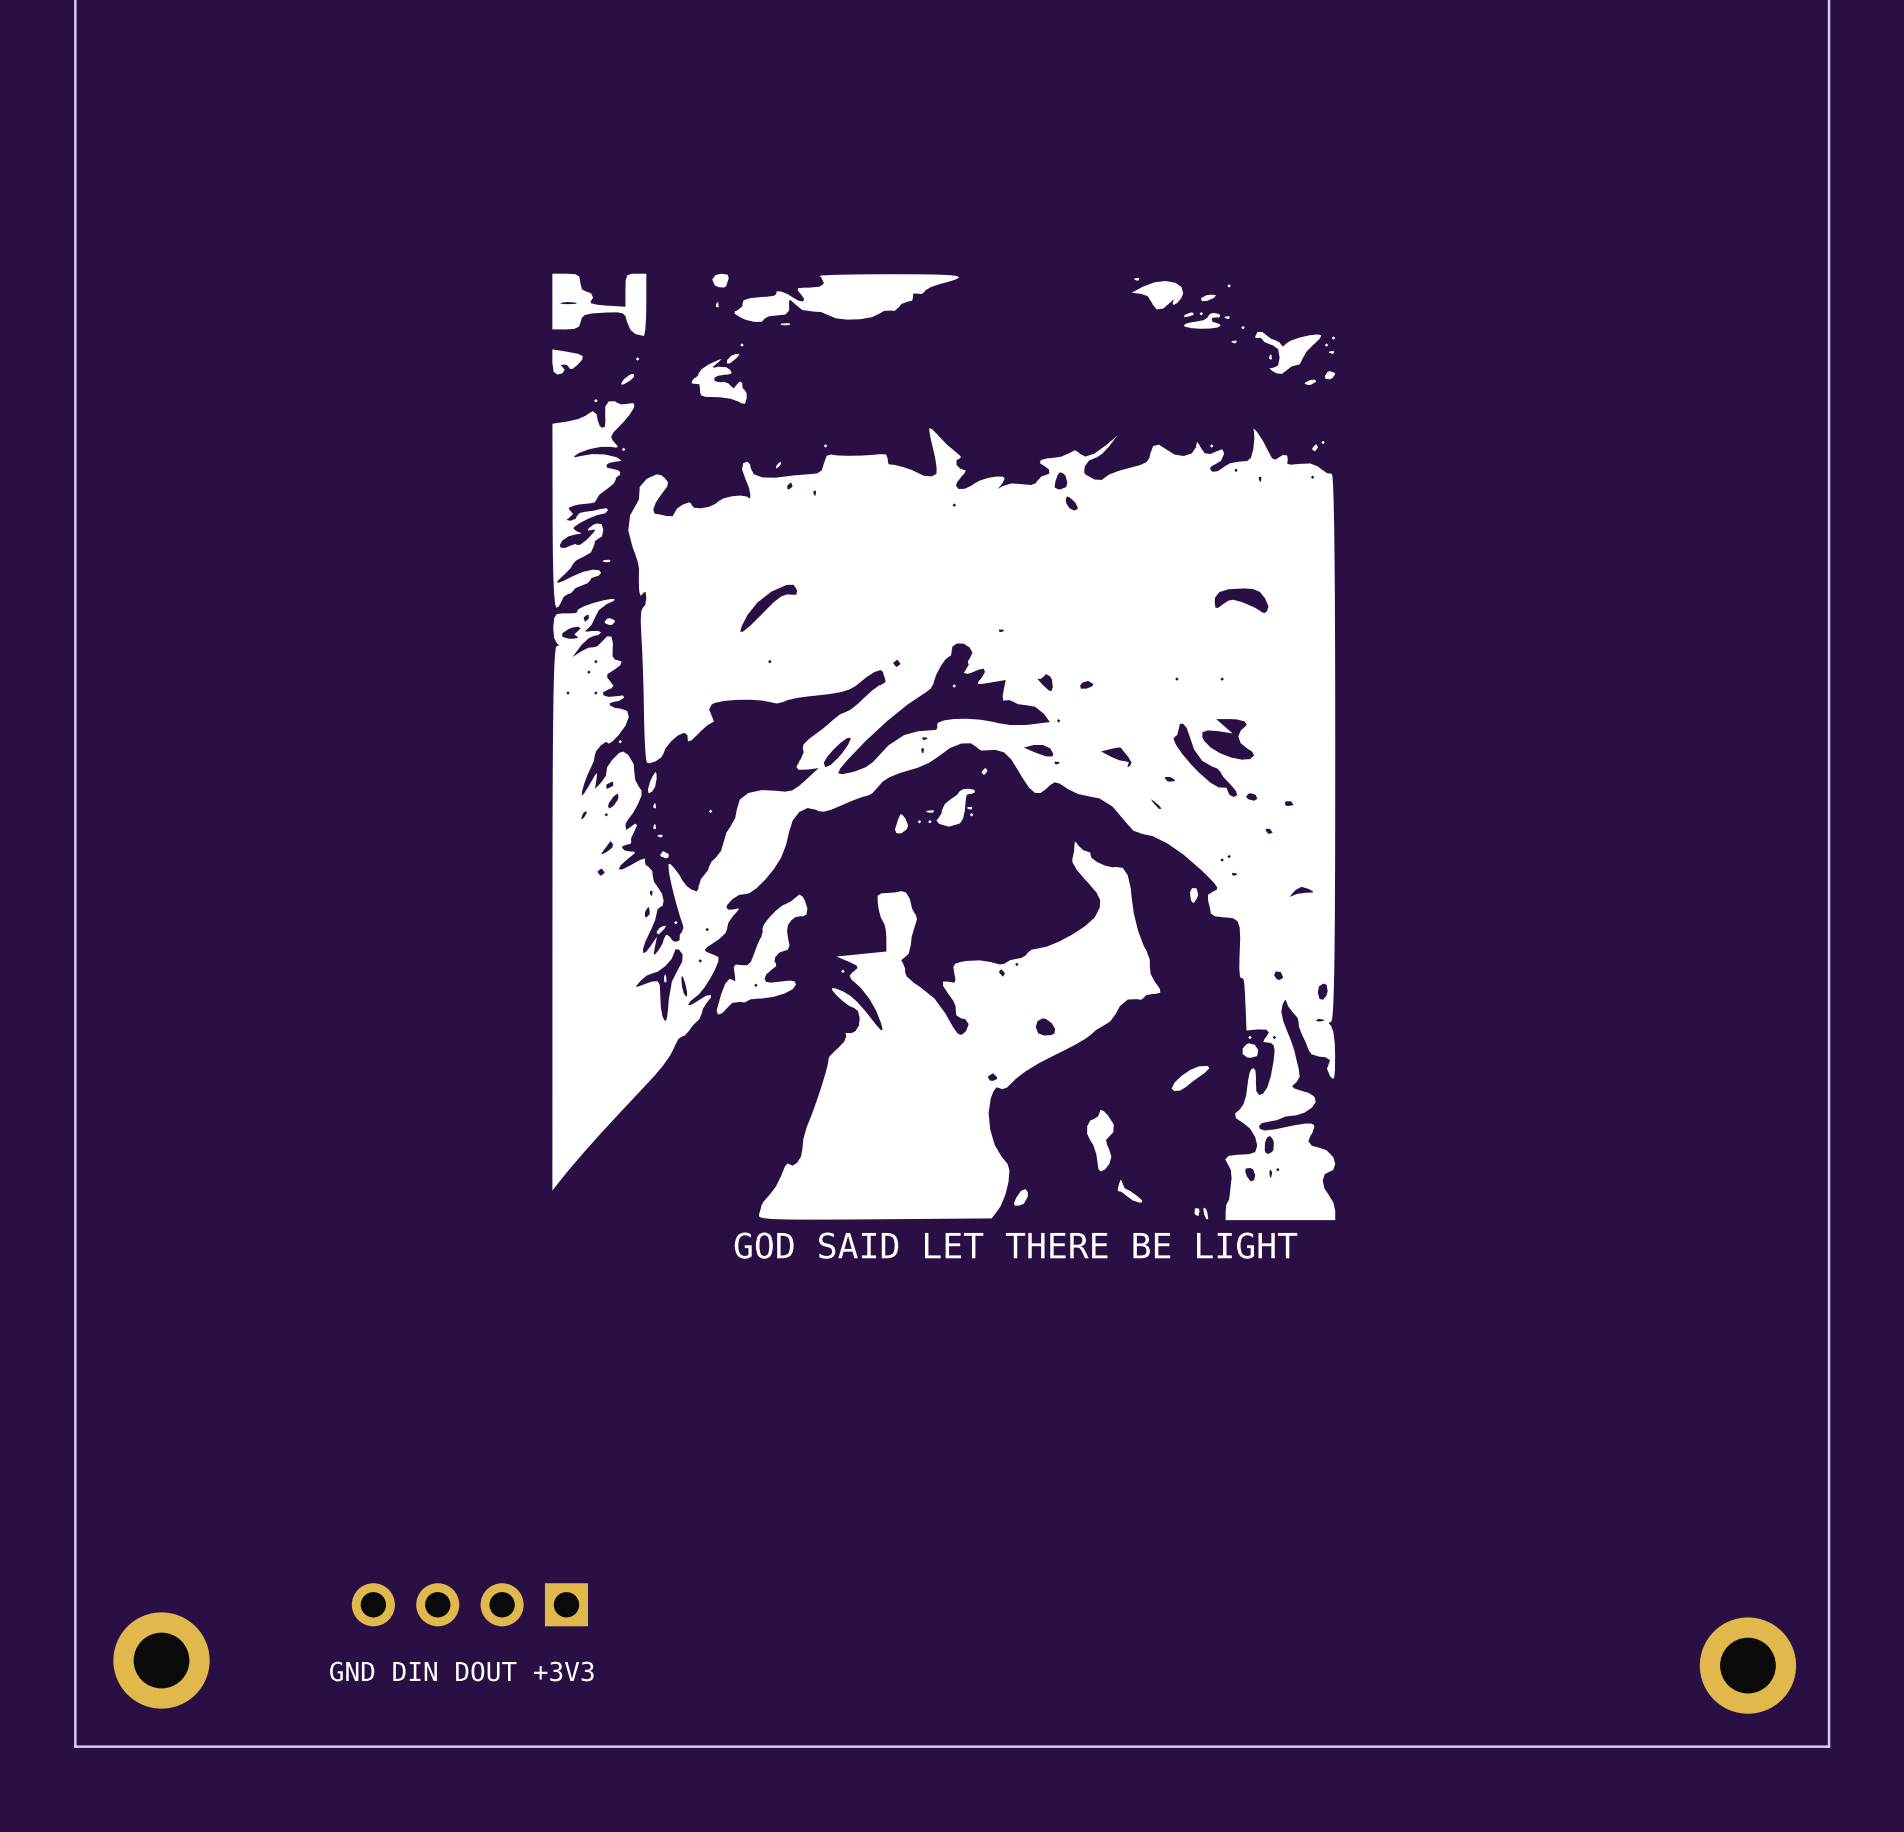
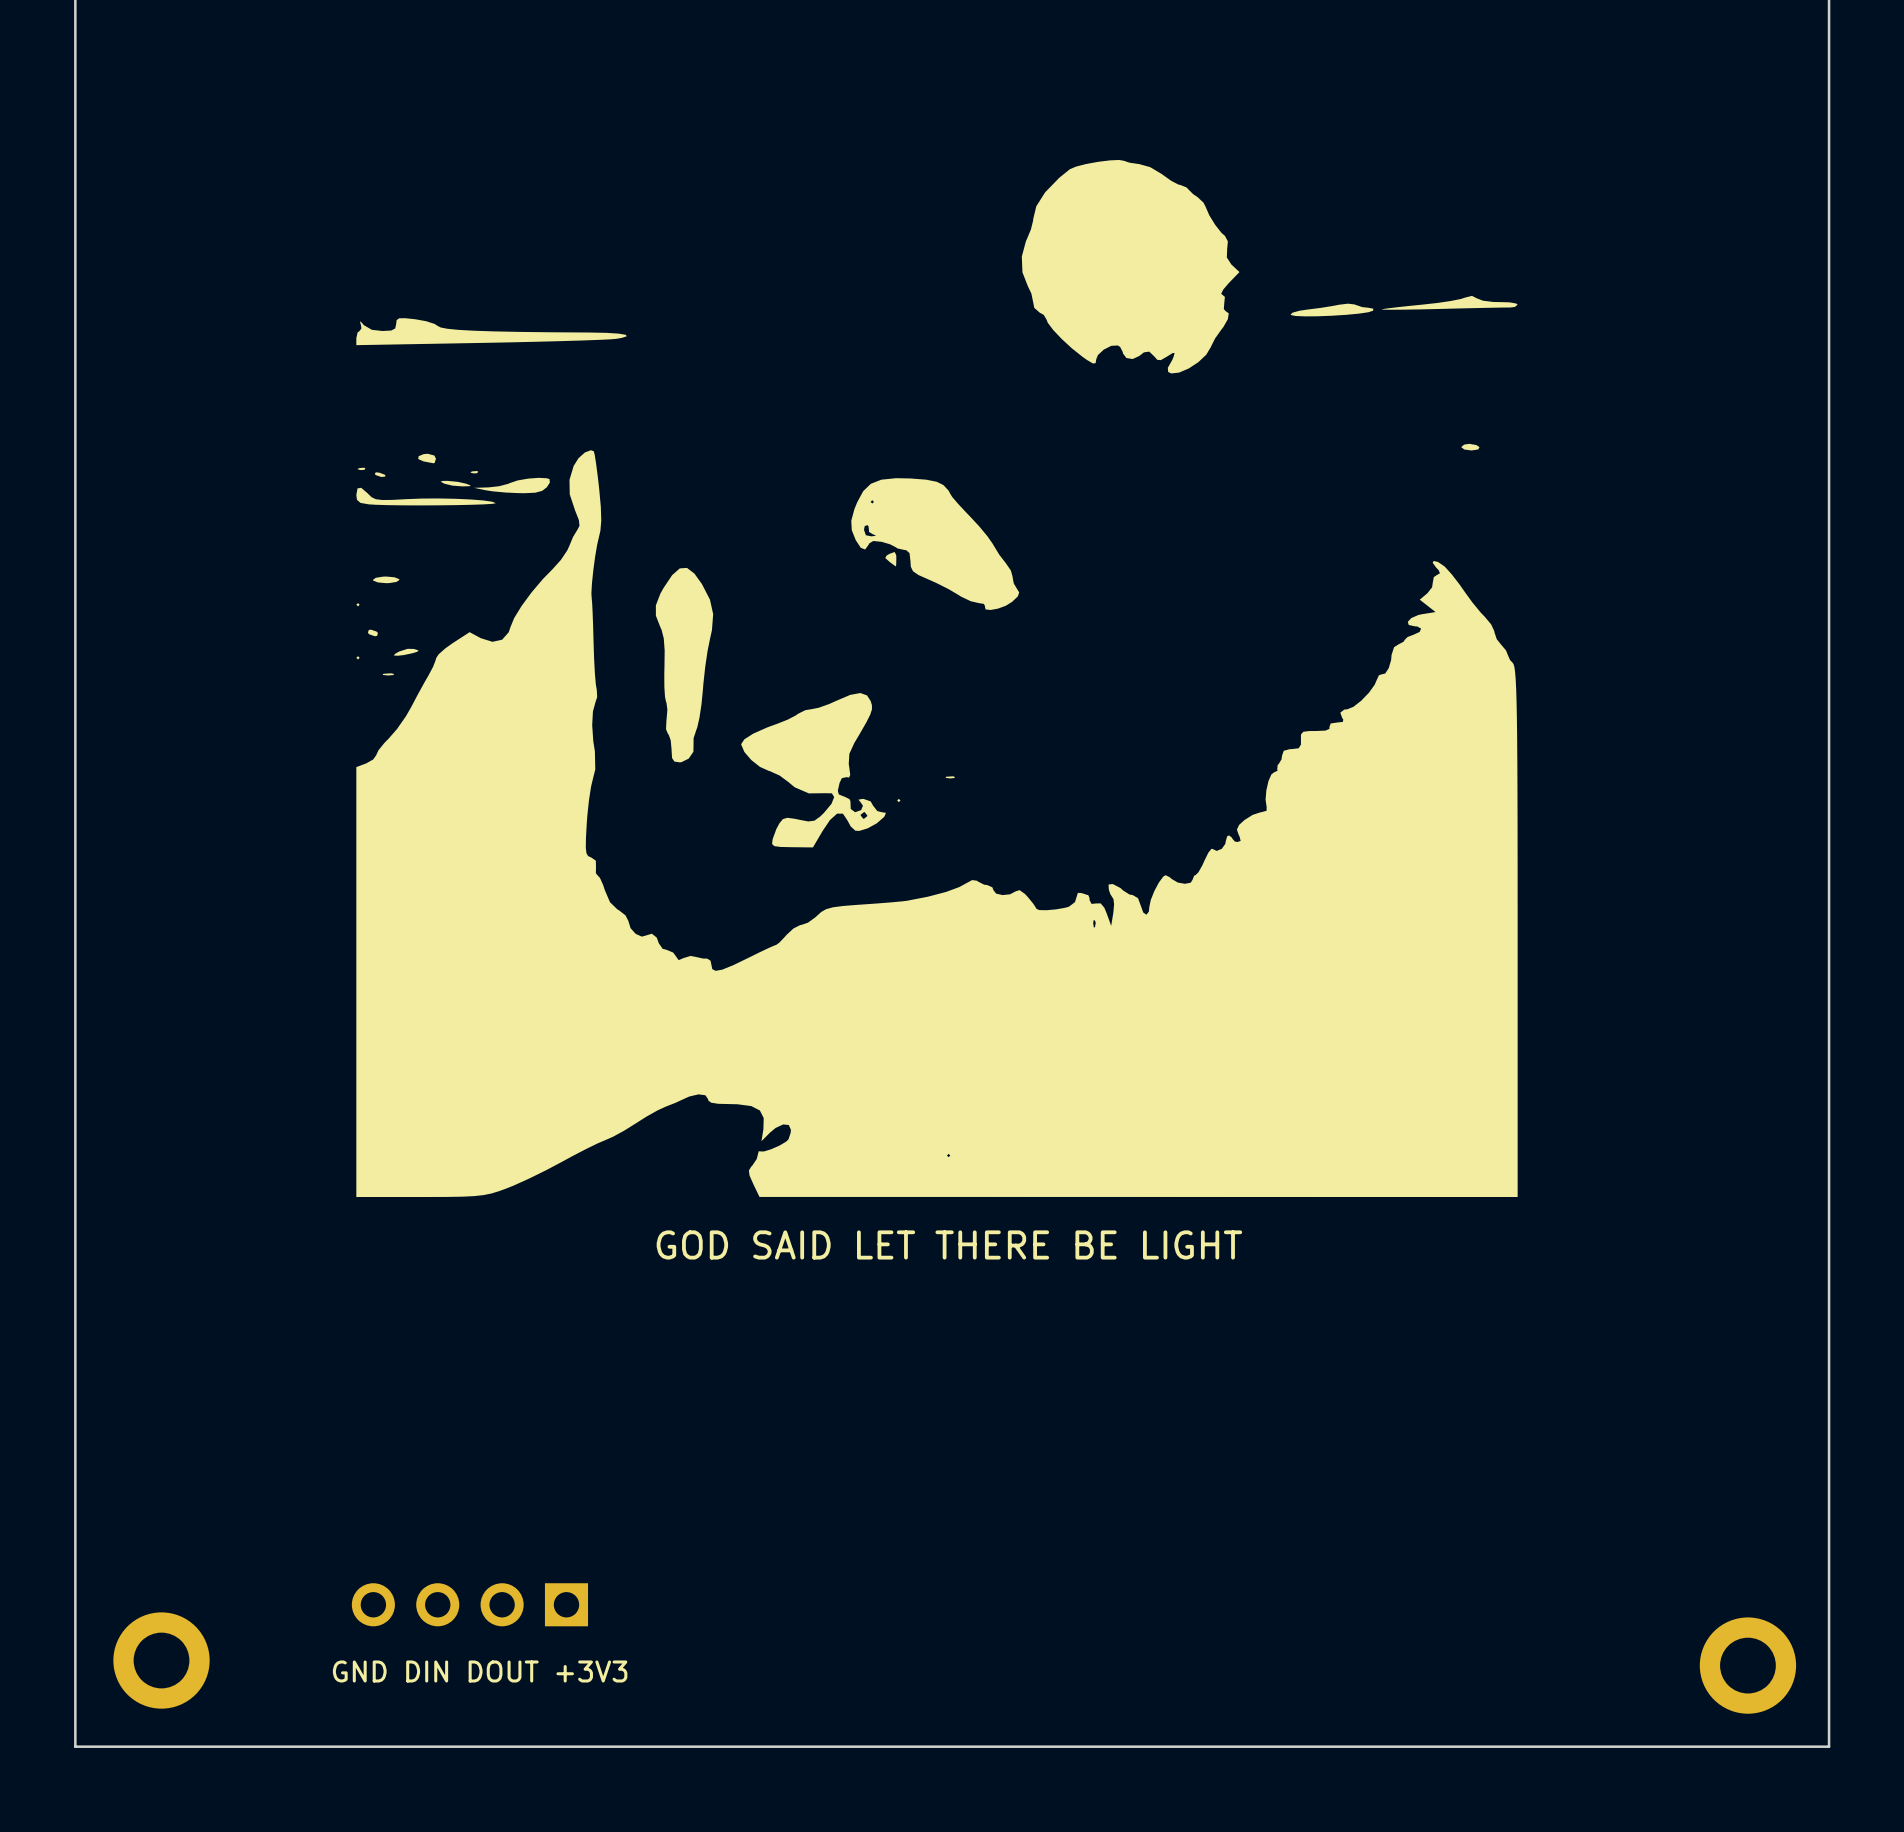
drawing: none -> [356, 159, 1518, 1198]
drawing: [552, 273, 1336, 1221] -> none
text position: GOD SAID LET THERE BE LIGHT (1015, 1245) -> GOD SAID LET THERE BE LIGHT (949, 1244)

